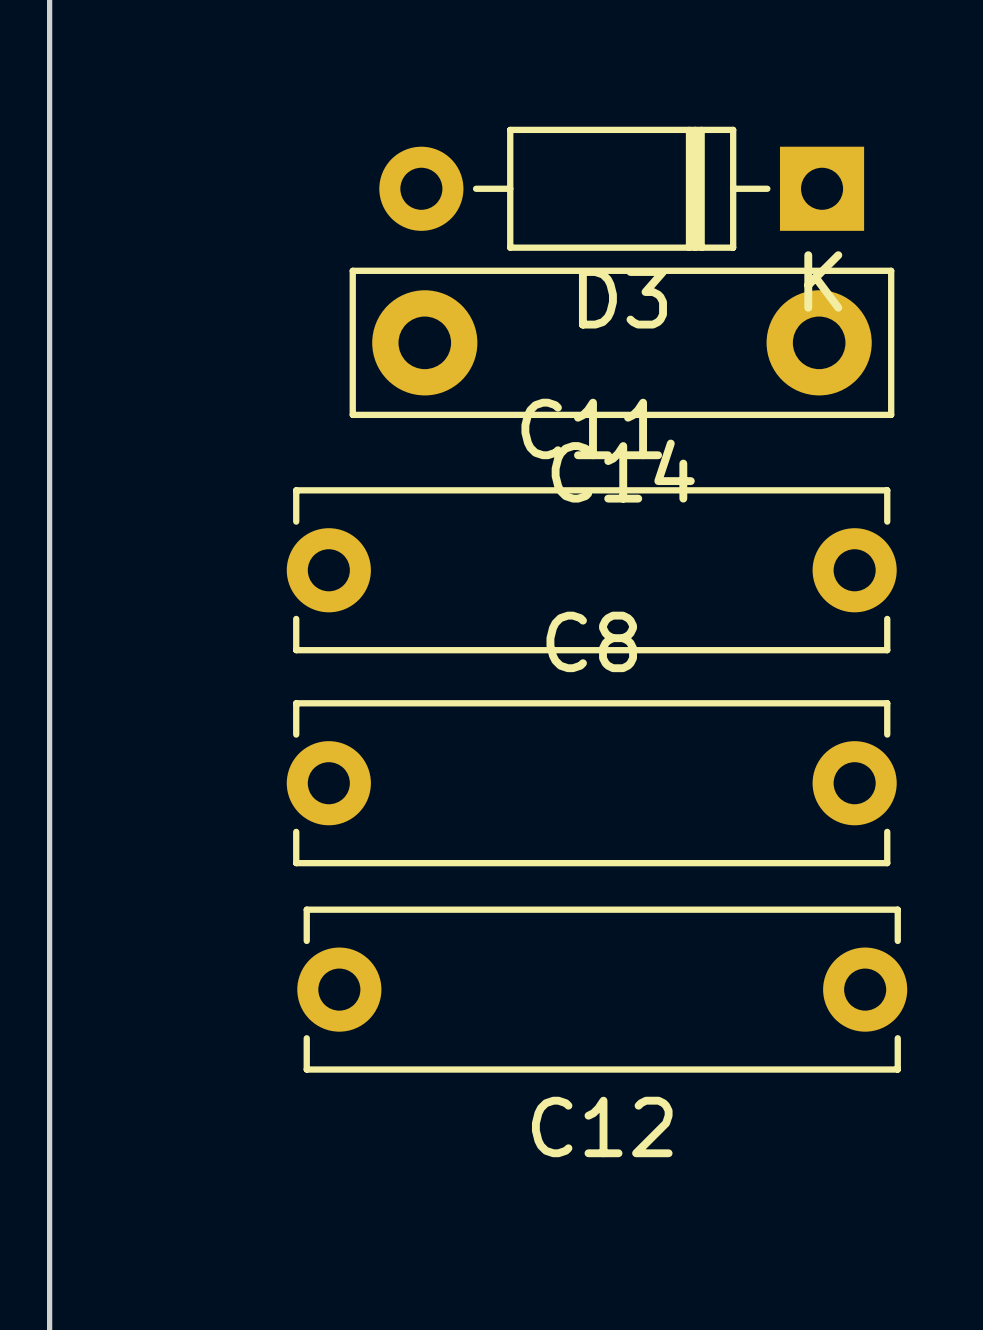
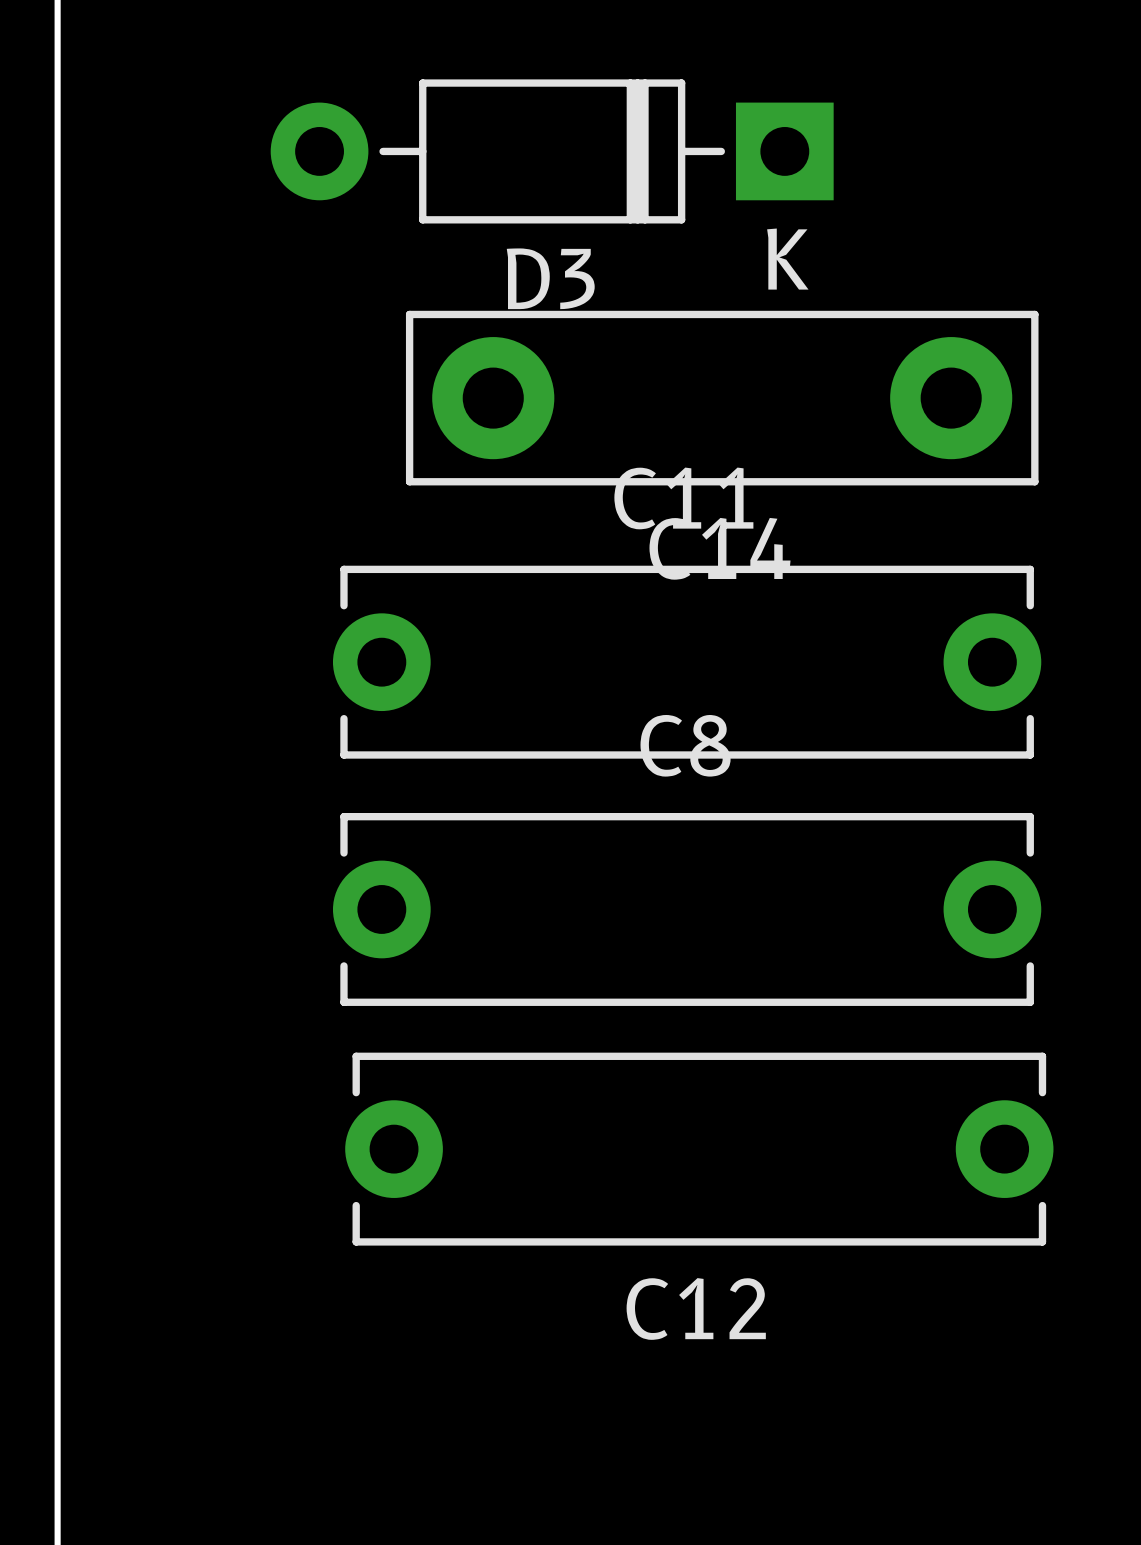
D3 position: (621, 188) -> (552, 151)

